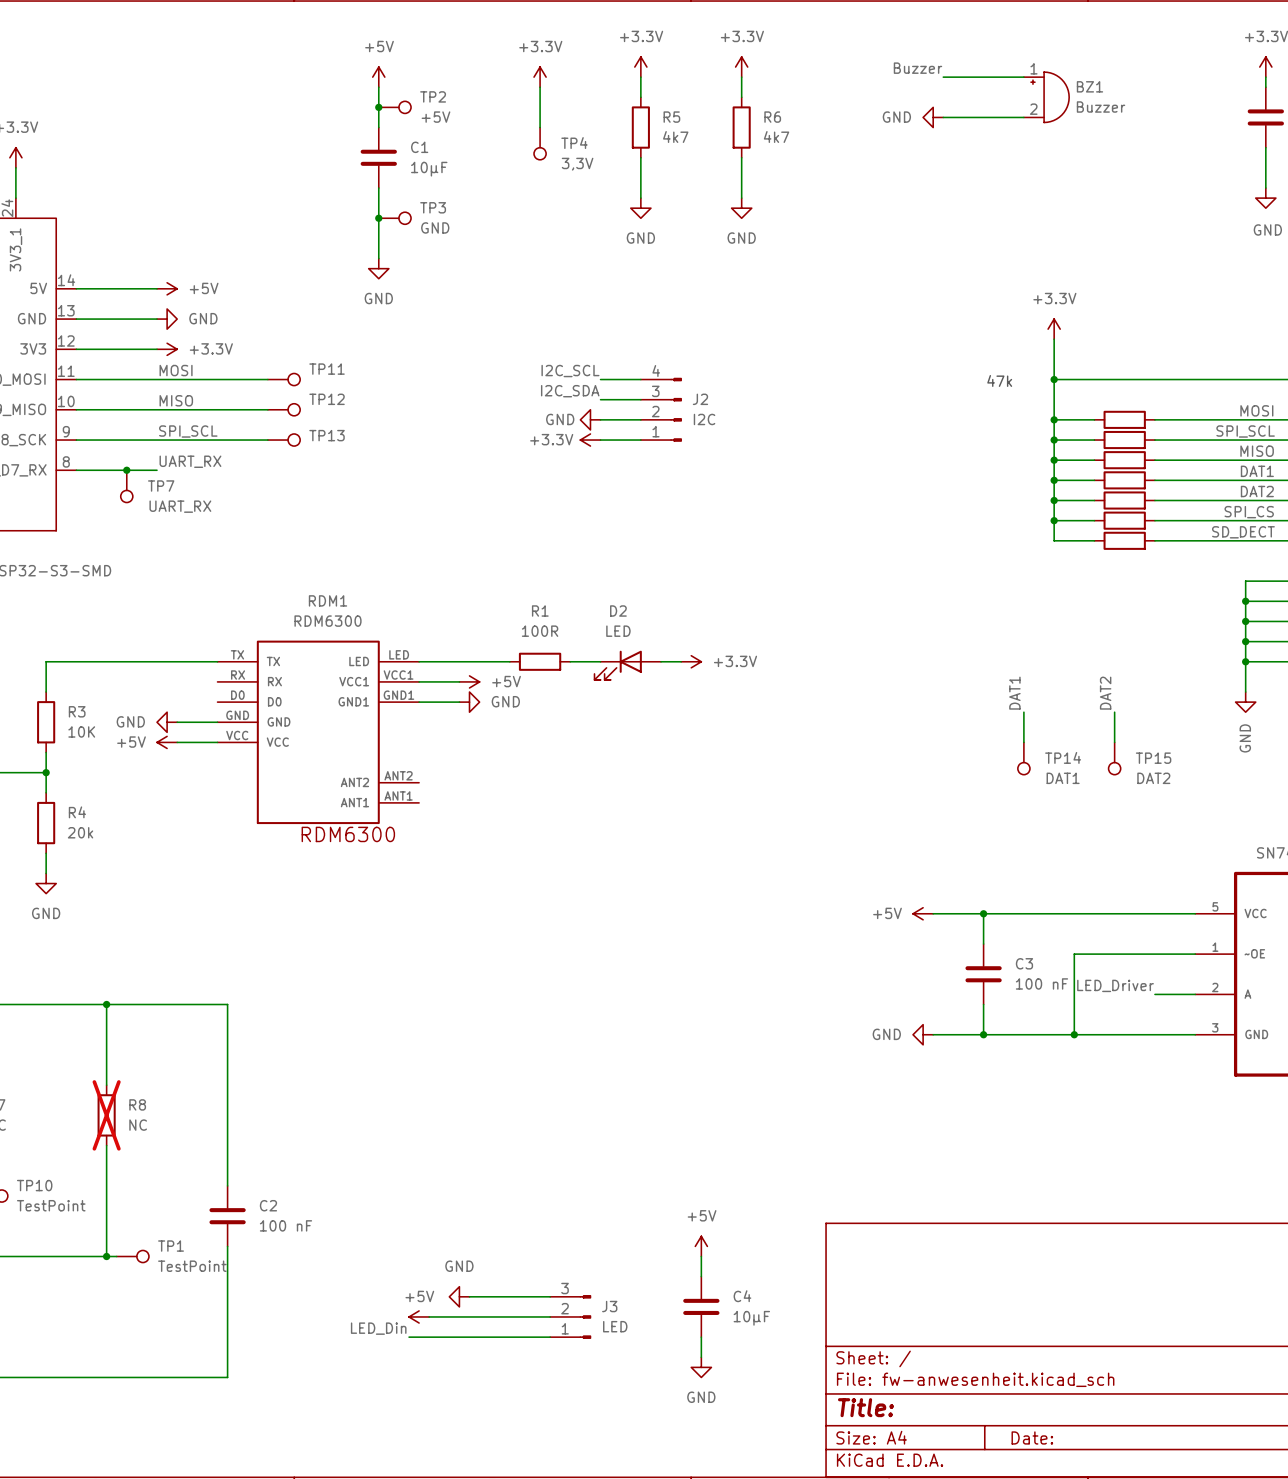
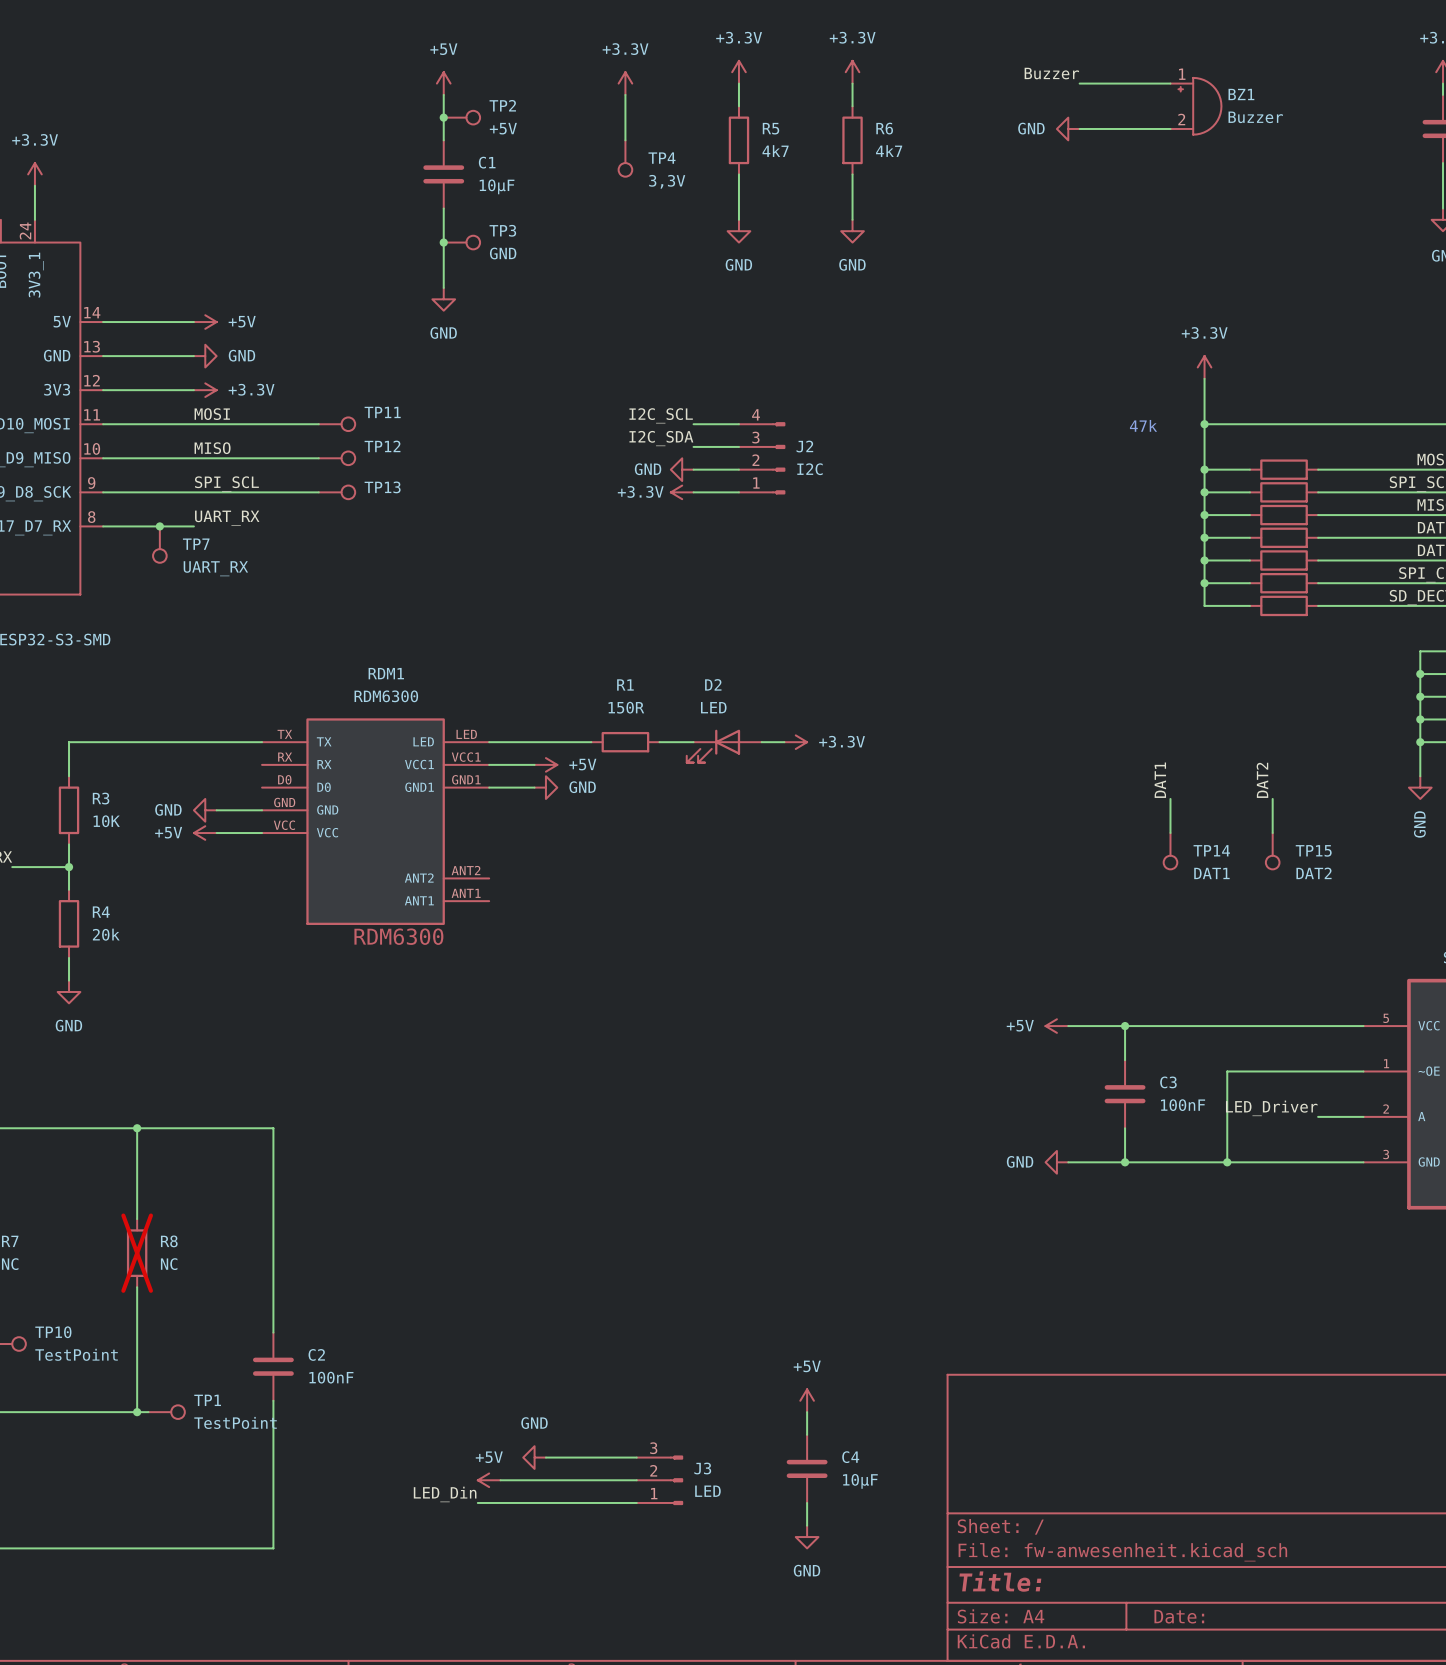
R1 value: 100R (540, 631) -> 150R (626, 707)
C3 value: 100 nF (1041, 983) -> 100nF (1183, 1105)
C2 value: 100 nF (285, 1225) -> 100nF (331, 1377)

